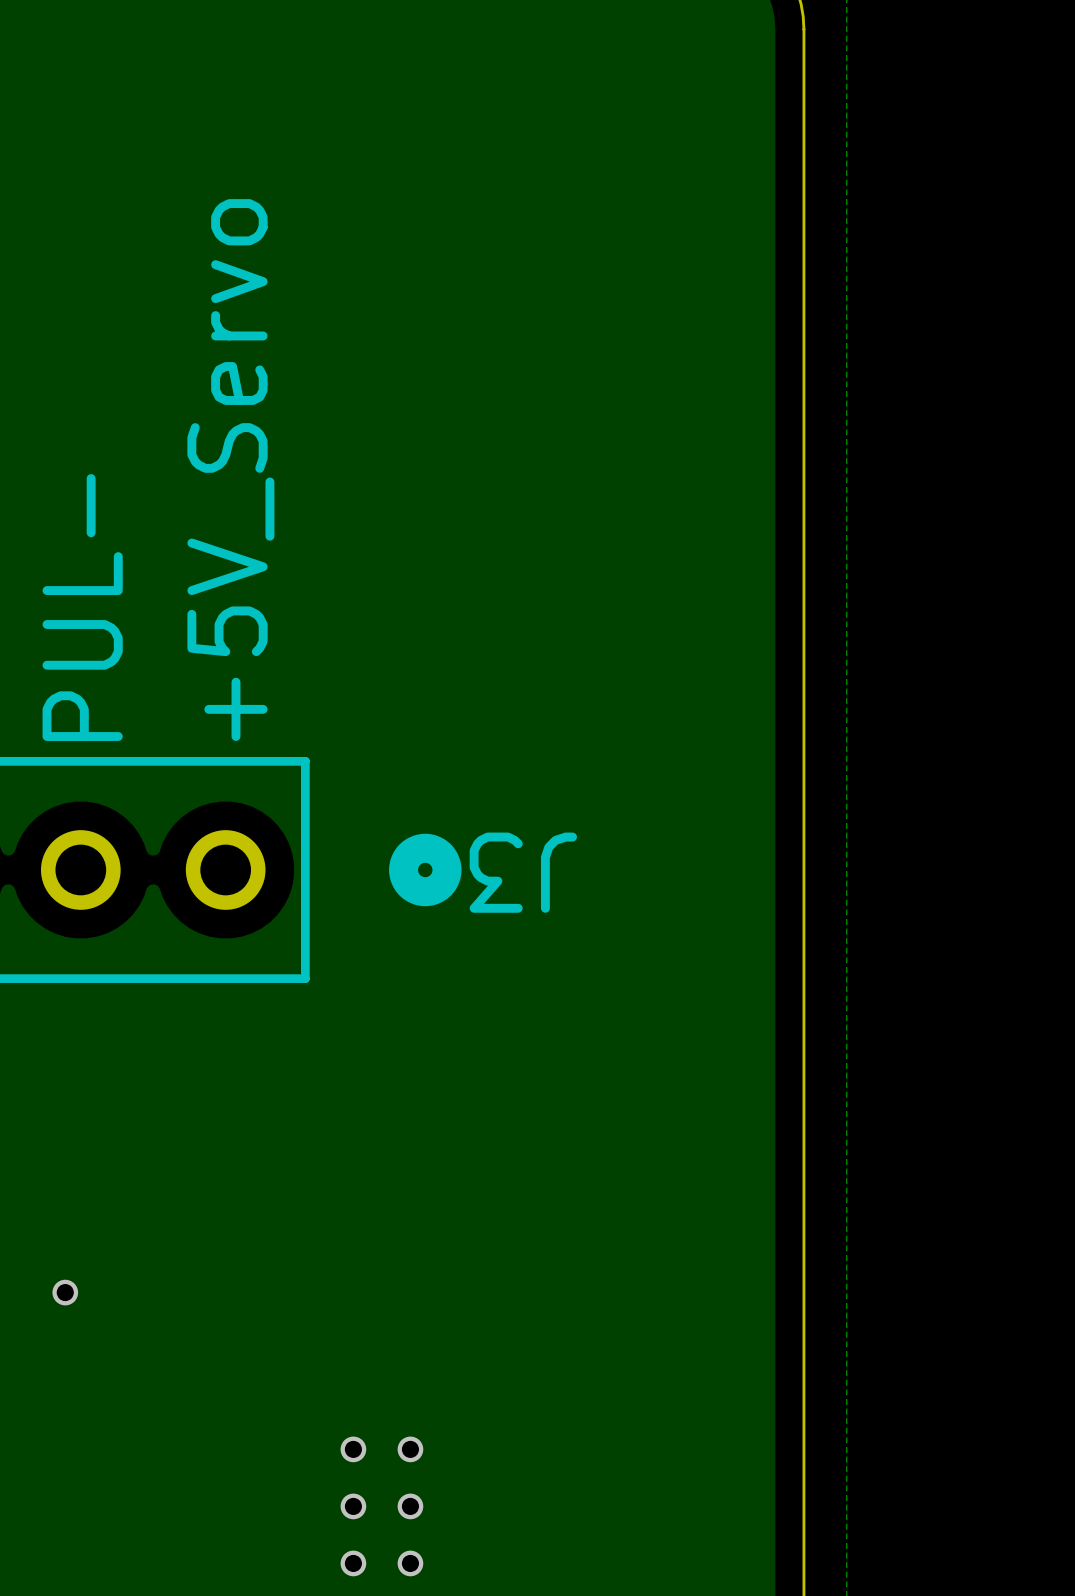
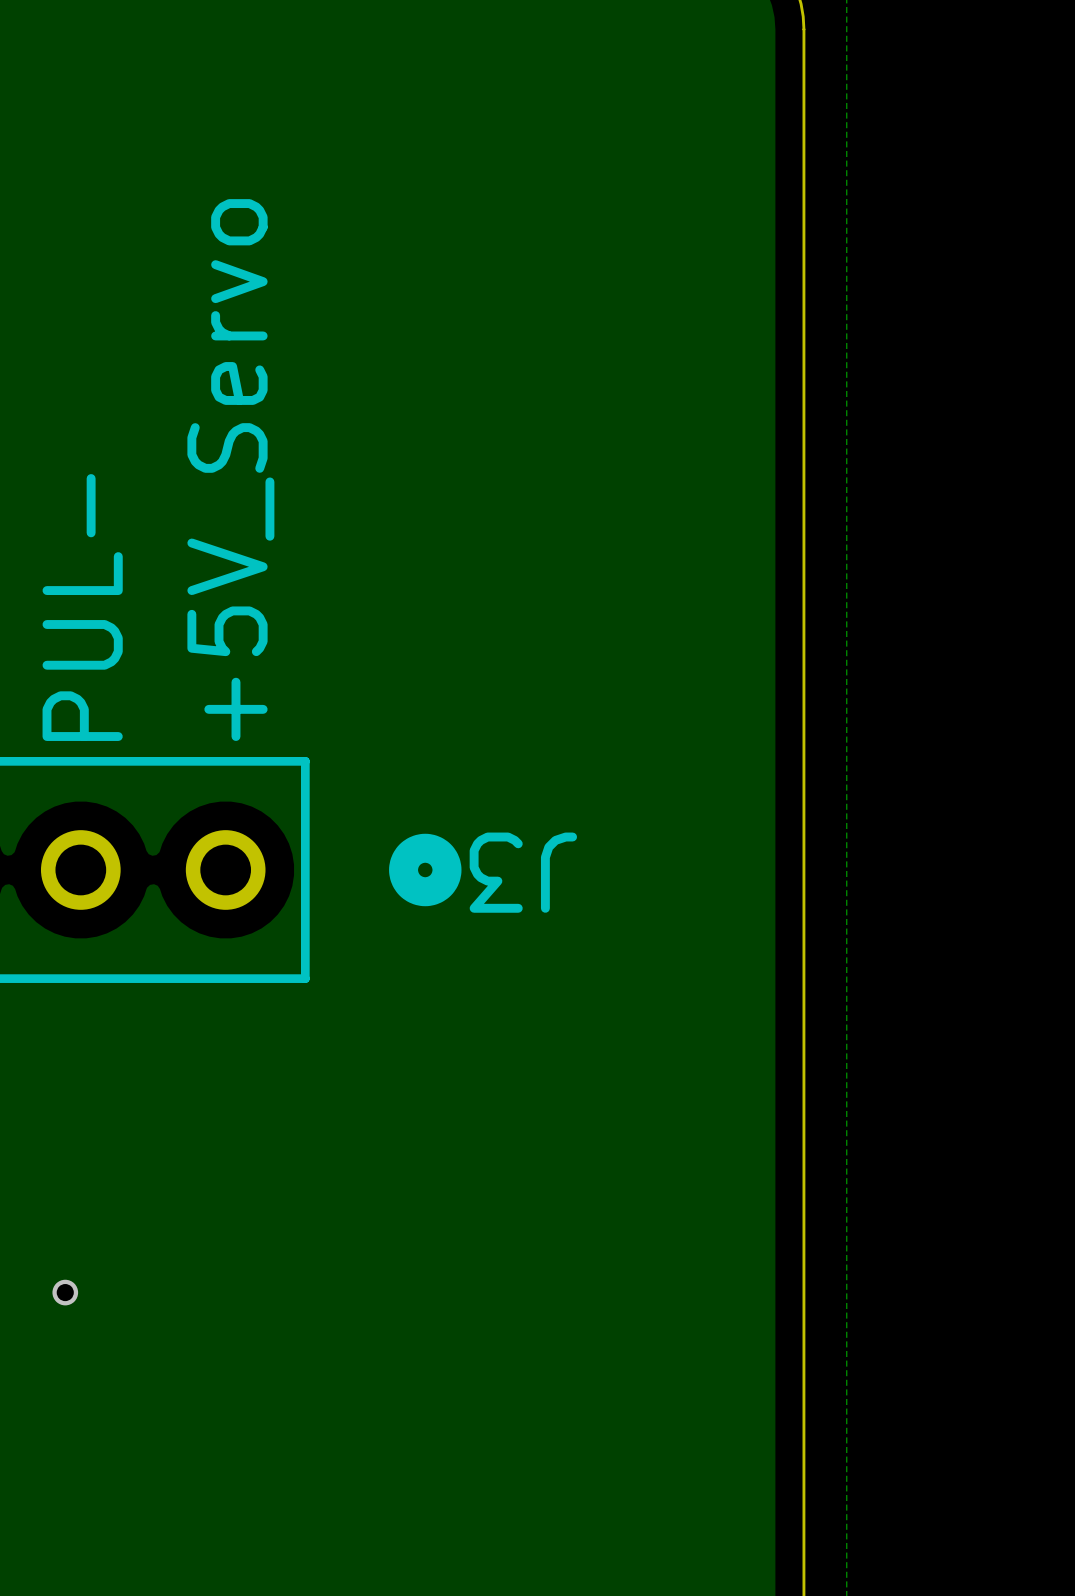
via: (353, 1449) -> none
via: (410, 1449) -> none
via: (353, 1506) -> none
via: (410, 1506) -> none
via: (353, 1563) -> none
via: (410, 1563) -> none

